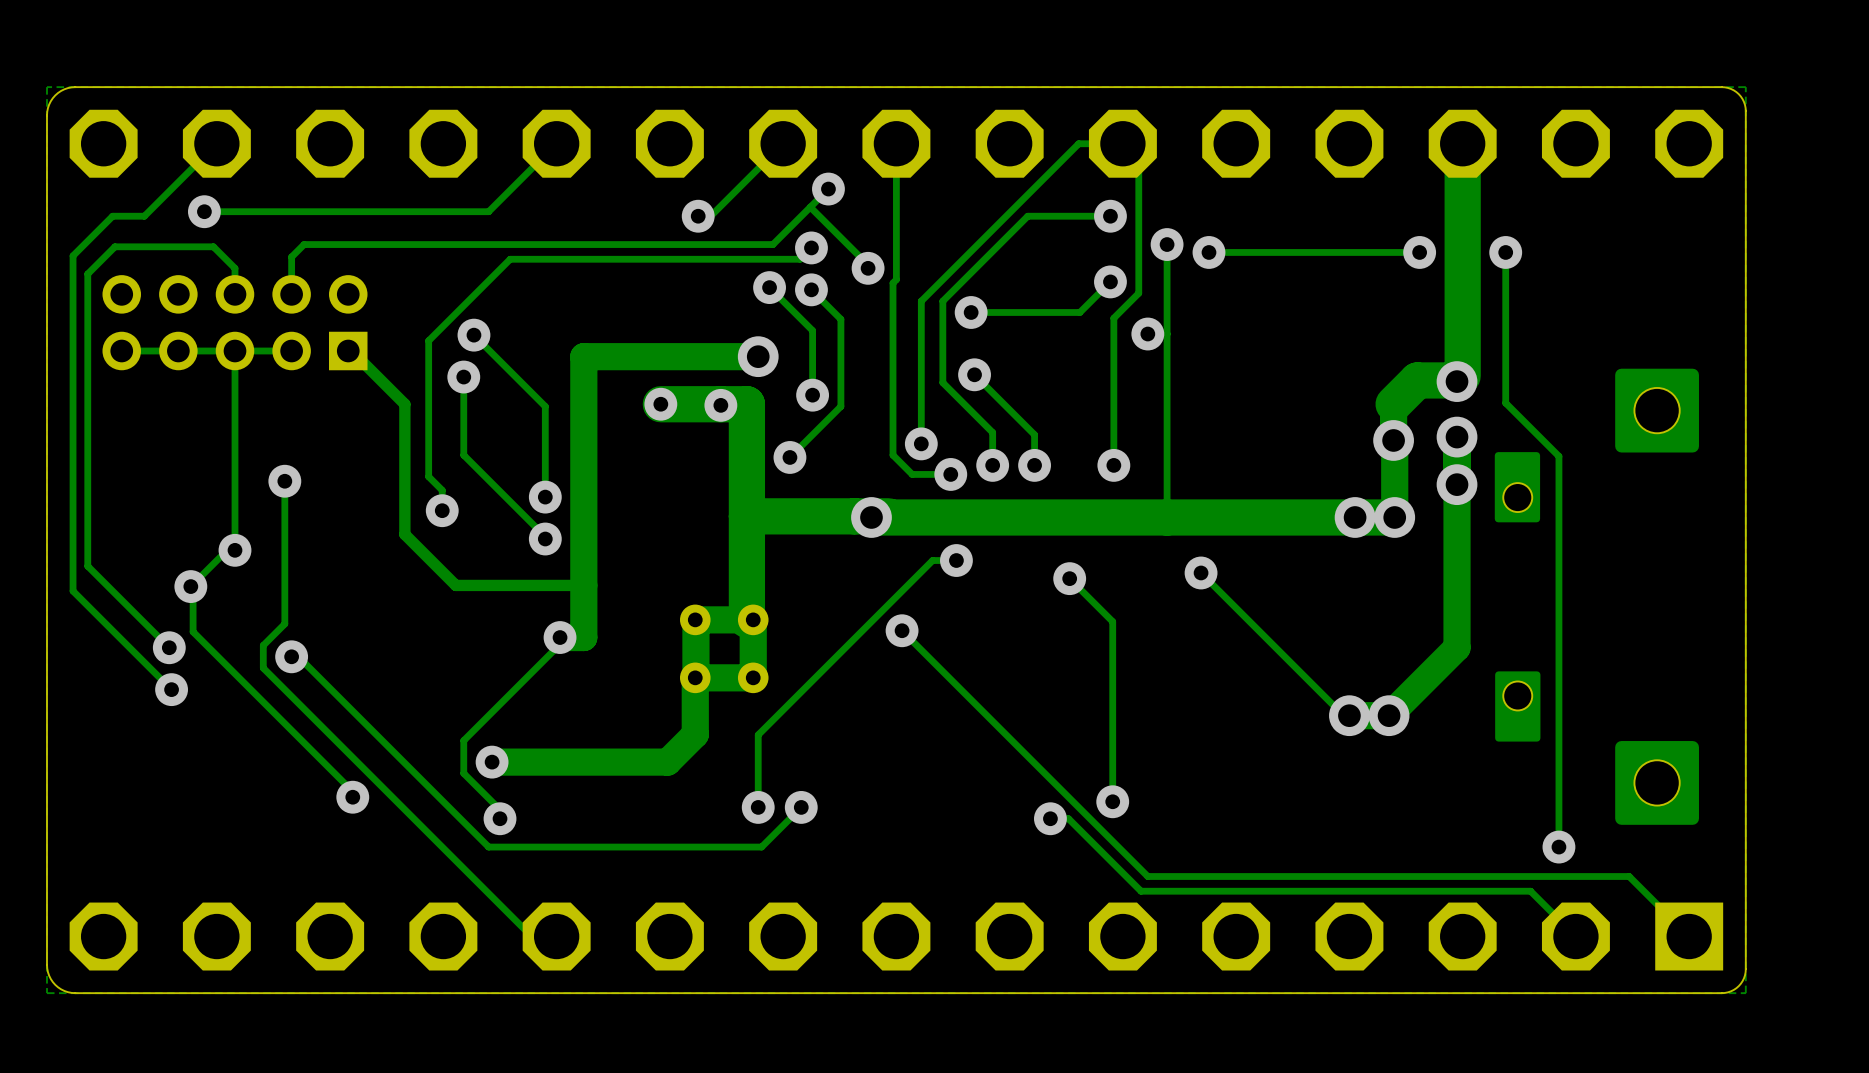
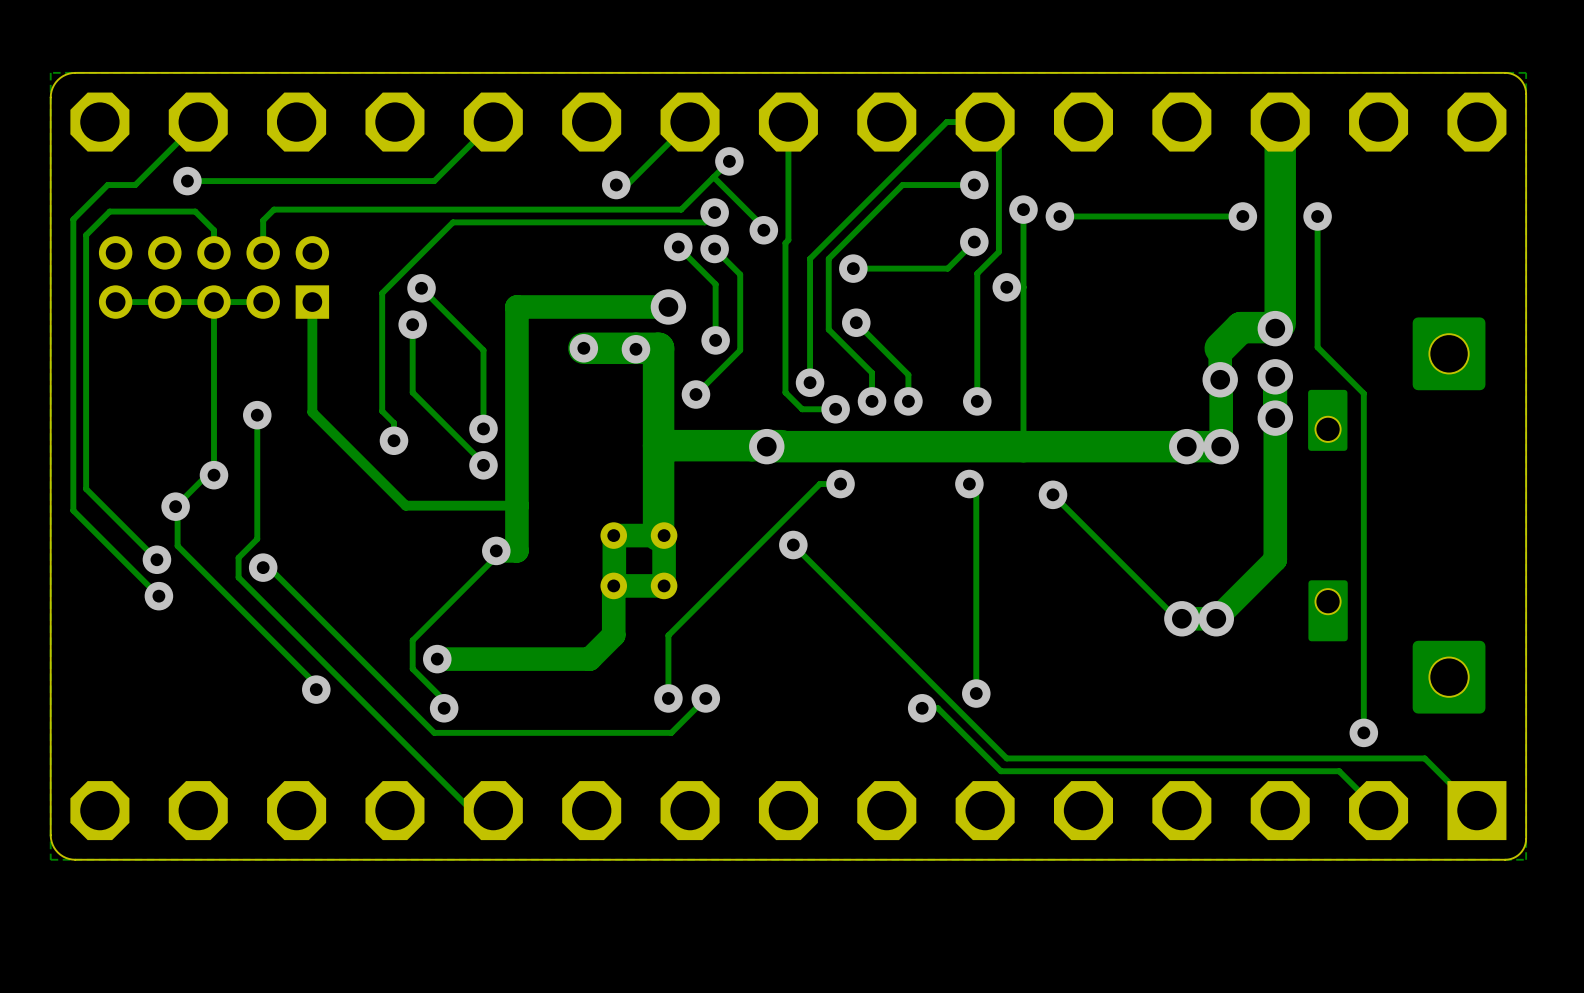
track: (348, 351) (351, 351) (404, 404) (404, 534) -> (312, 302) (312, 412) (361, 461)
track: (1069, 578) (1112, 621) -> (969, 484) (976, 490) (976, 537)
via position: (1069, 578) -> (969, 484)

